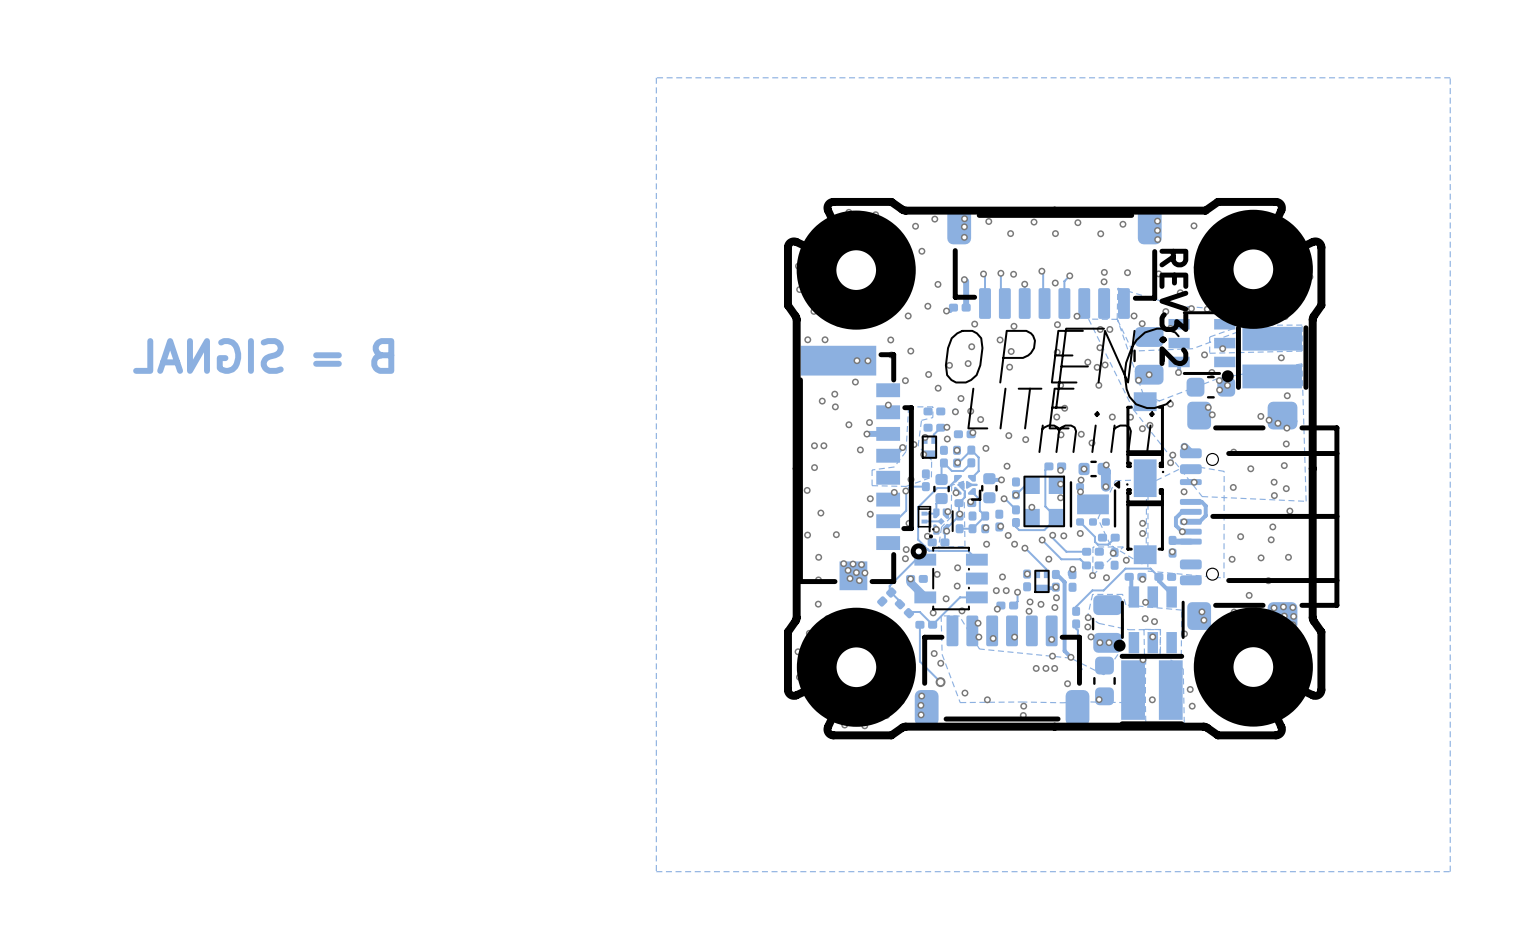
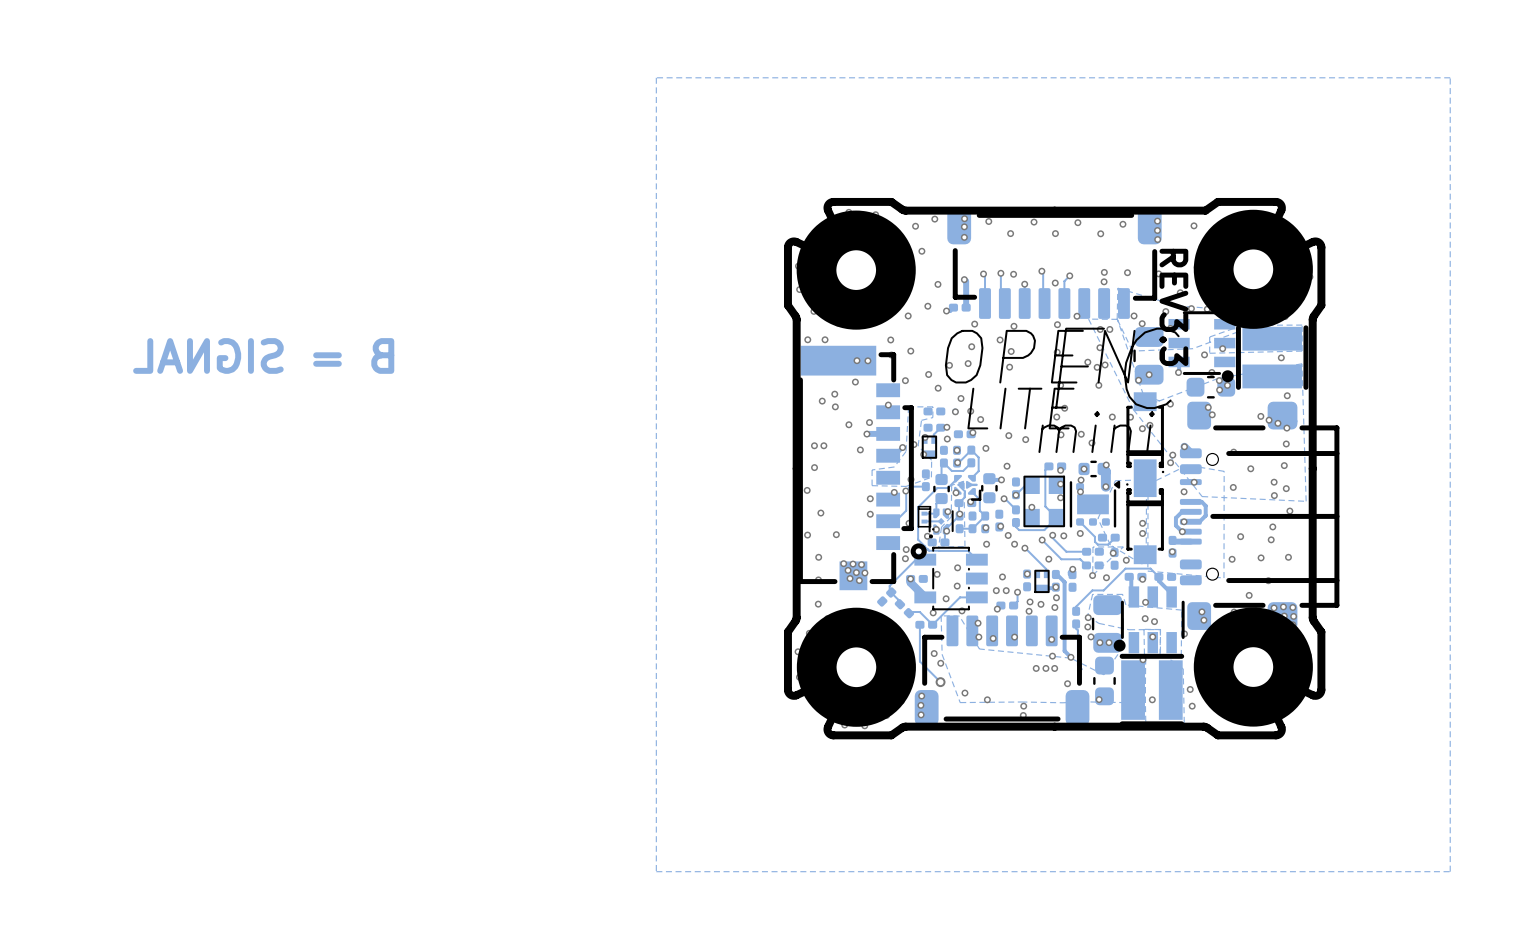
text: REV3.2 (1173, 307) -> REV3.3 (1173, 307)

